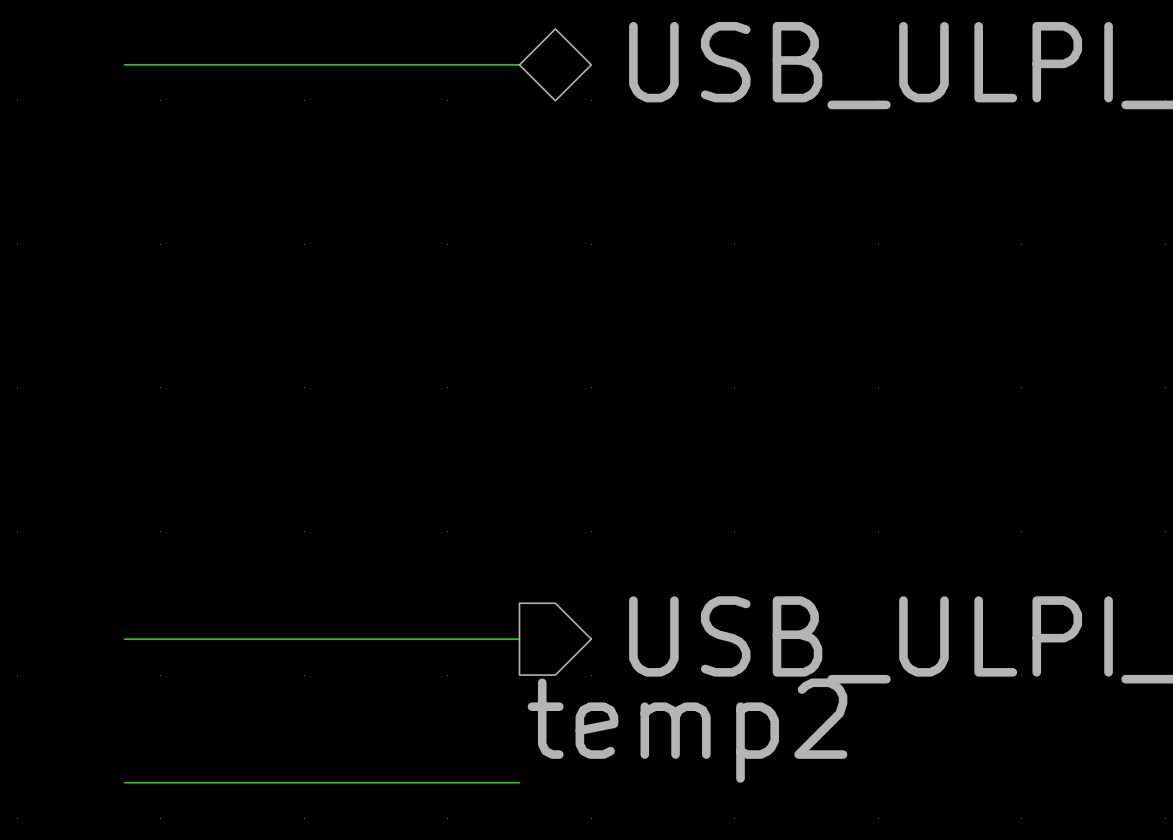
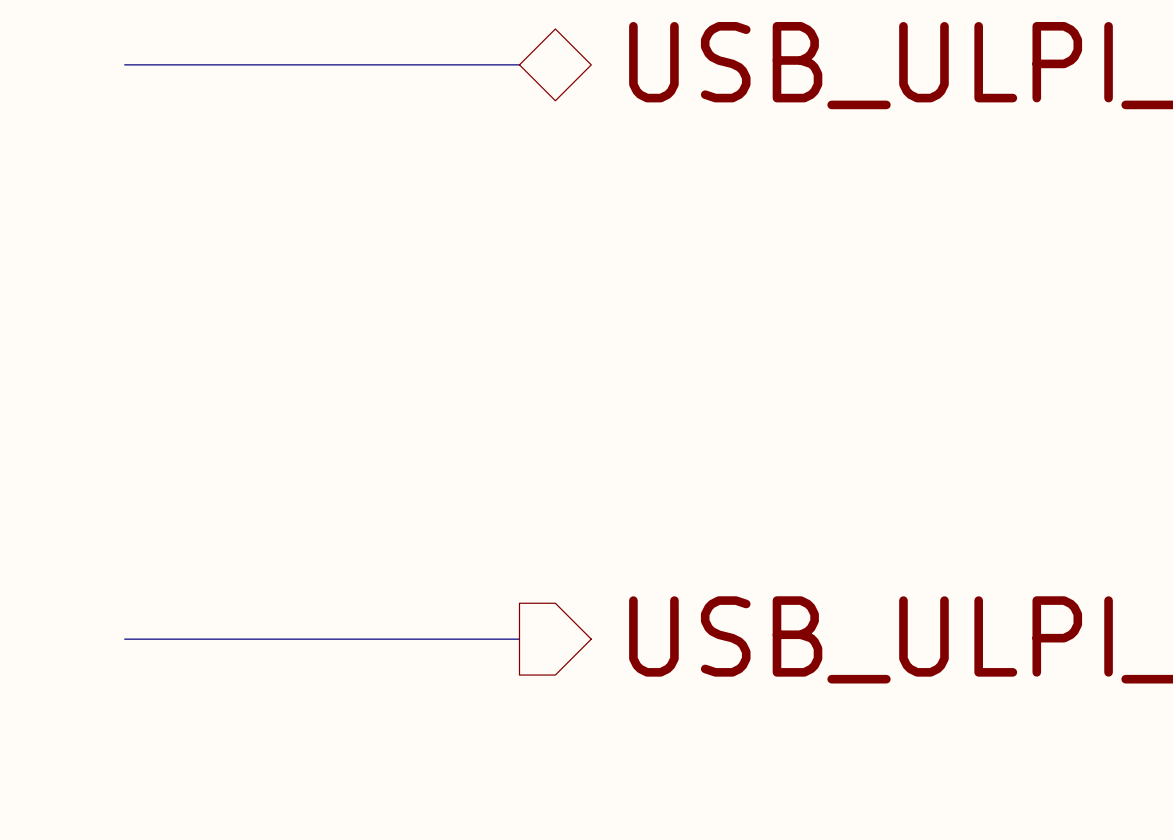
label: temp2 (687, 730) -> none
wire: (124, 782) (519, 782) -> none

